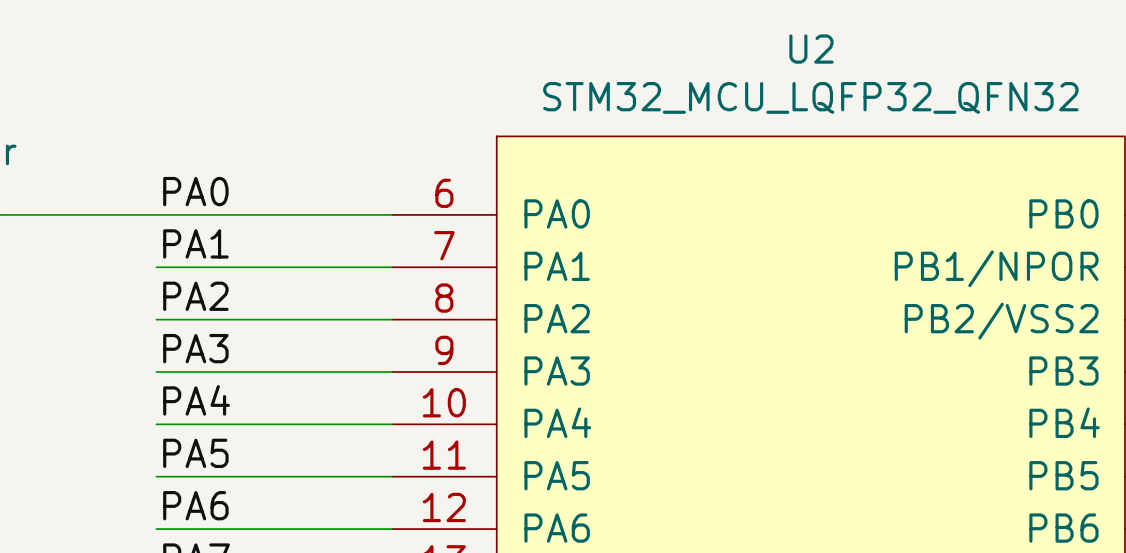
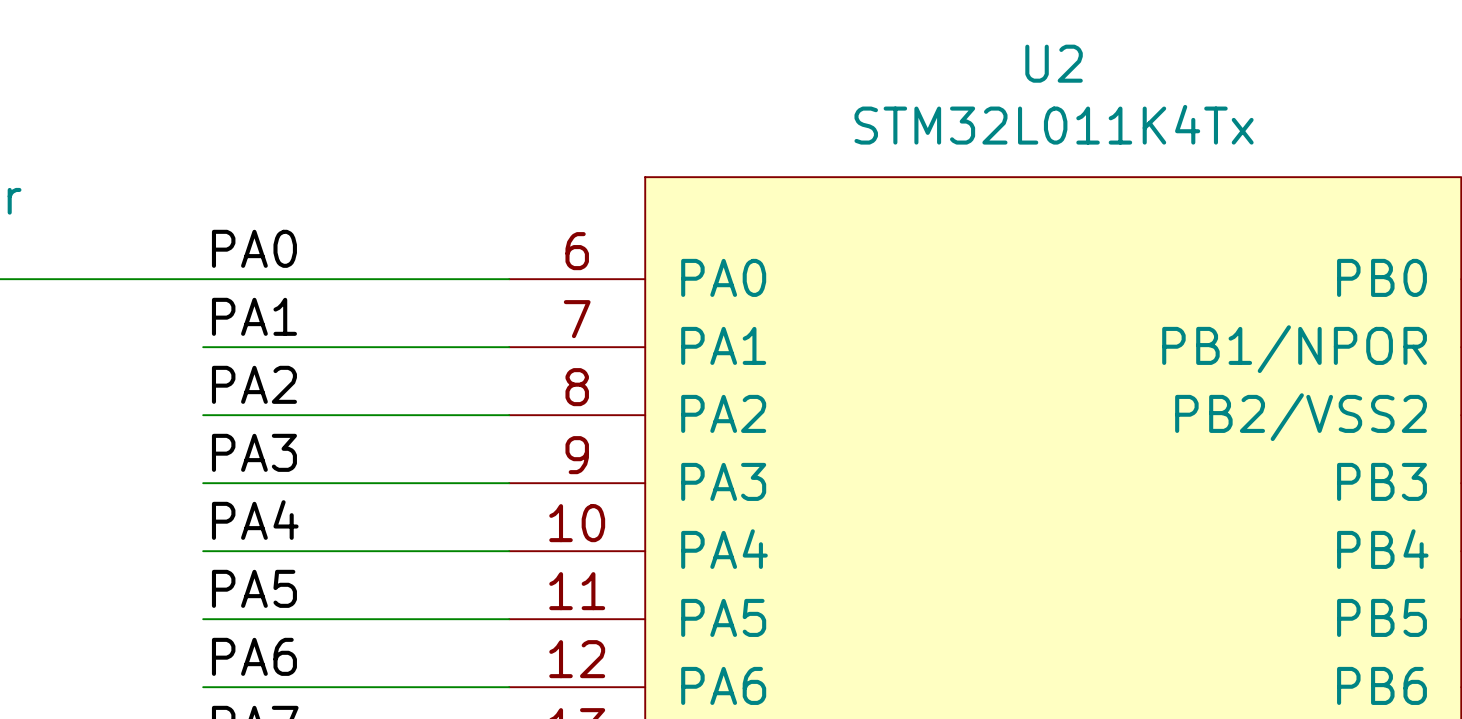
U2 value: STM32_MCU_LQFP32_QFN32 (810, 97) -> STM32L011K4Tx (1054, 124)

